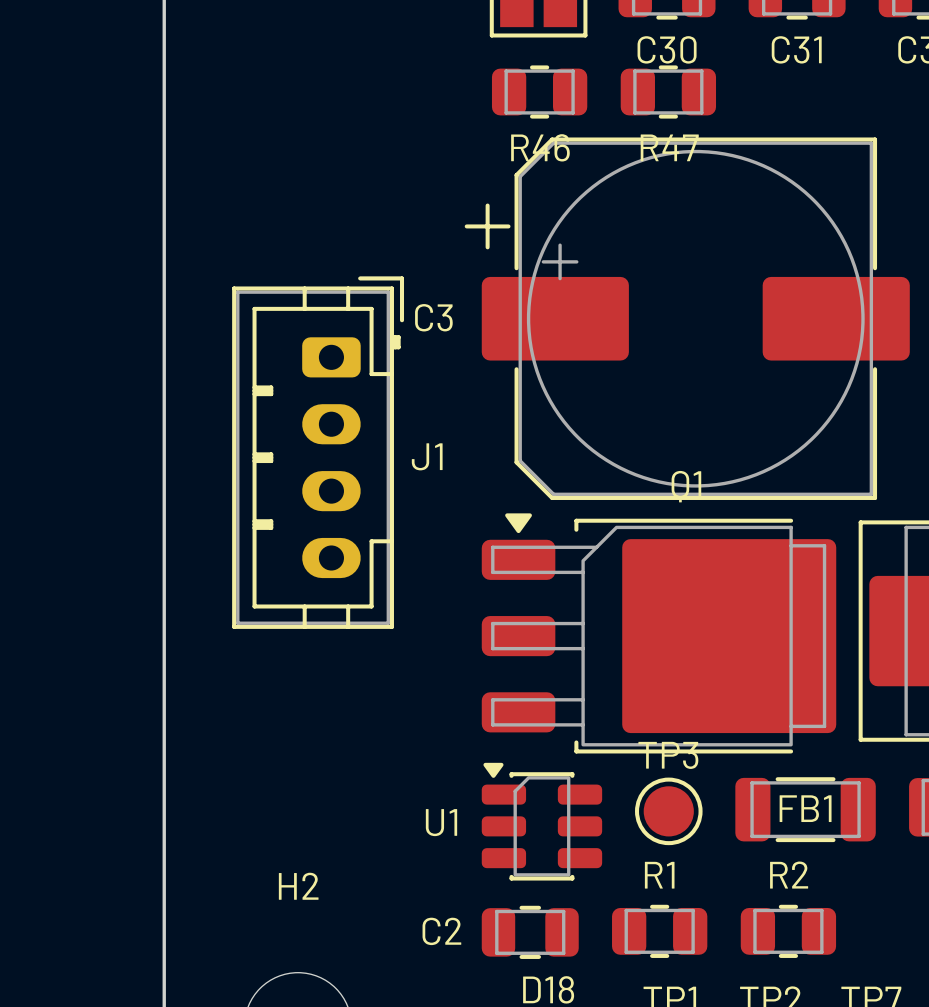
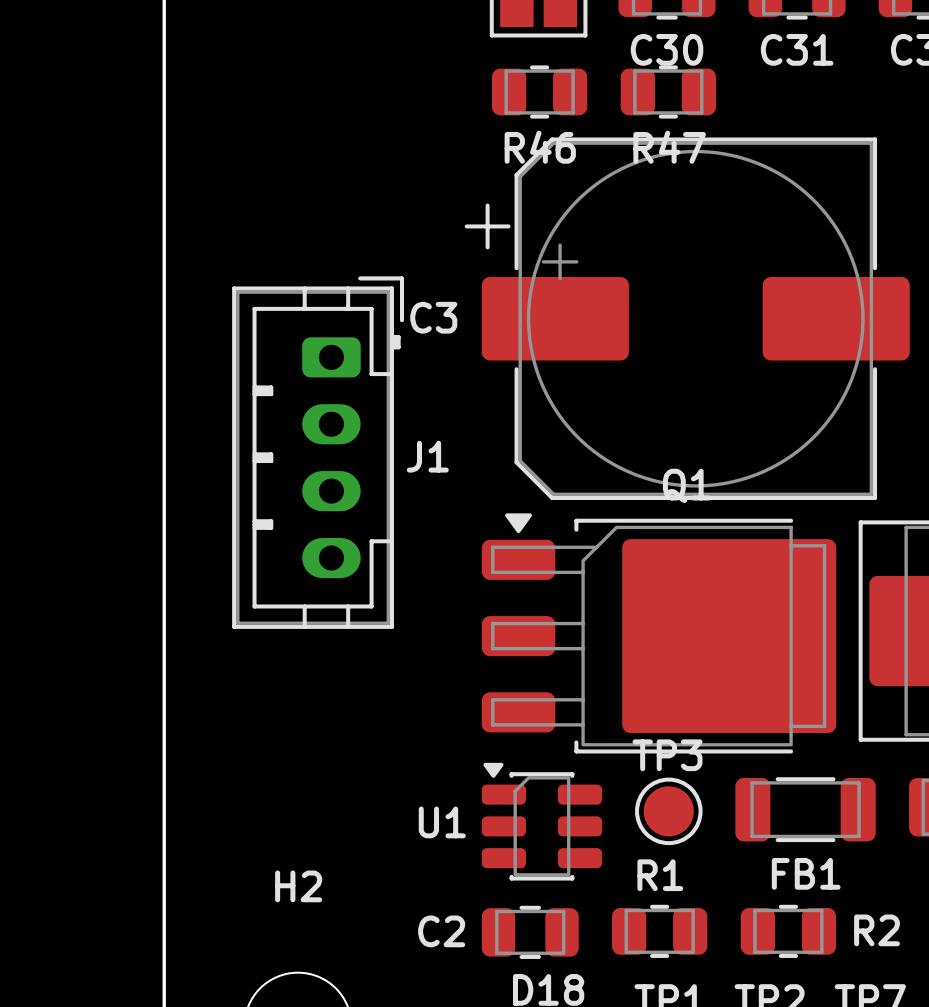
FB1 name position: FB1 (805, 808) -> FB1 (806, 873)
R2 name position: R2 (789, 875) -> R2 (877, 930)

